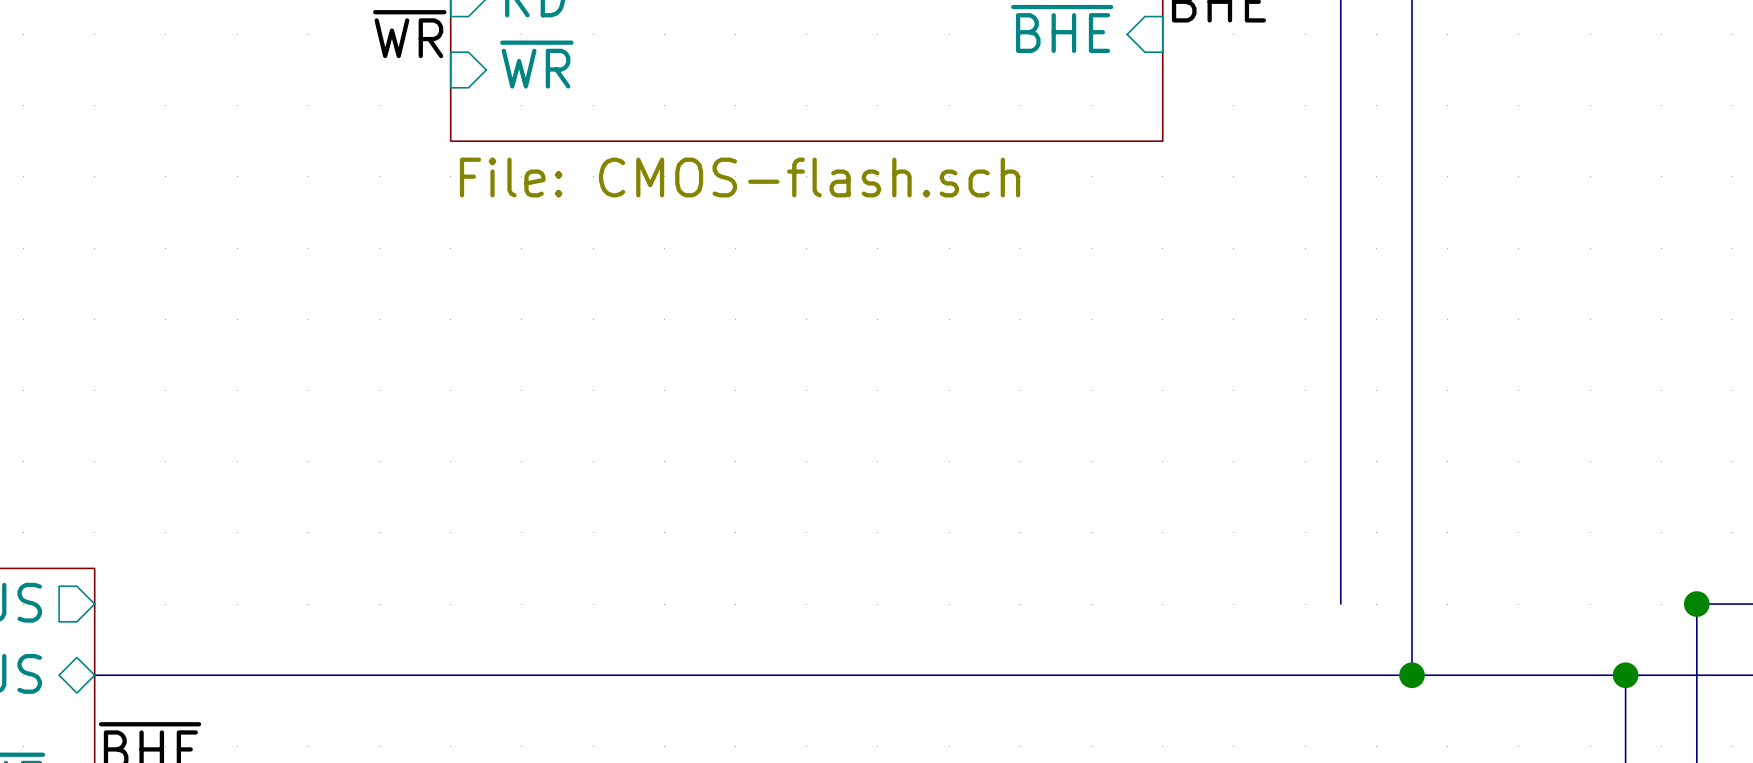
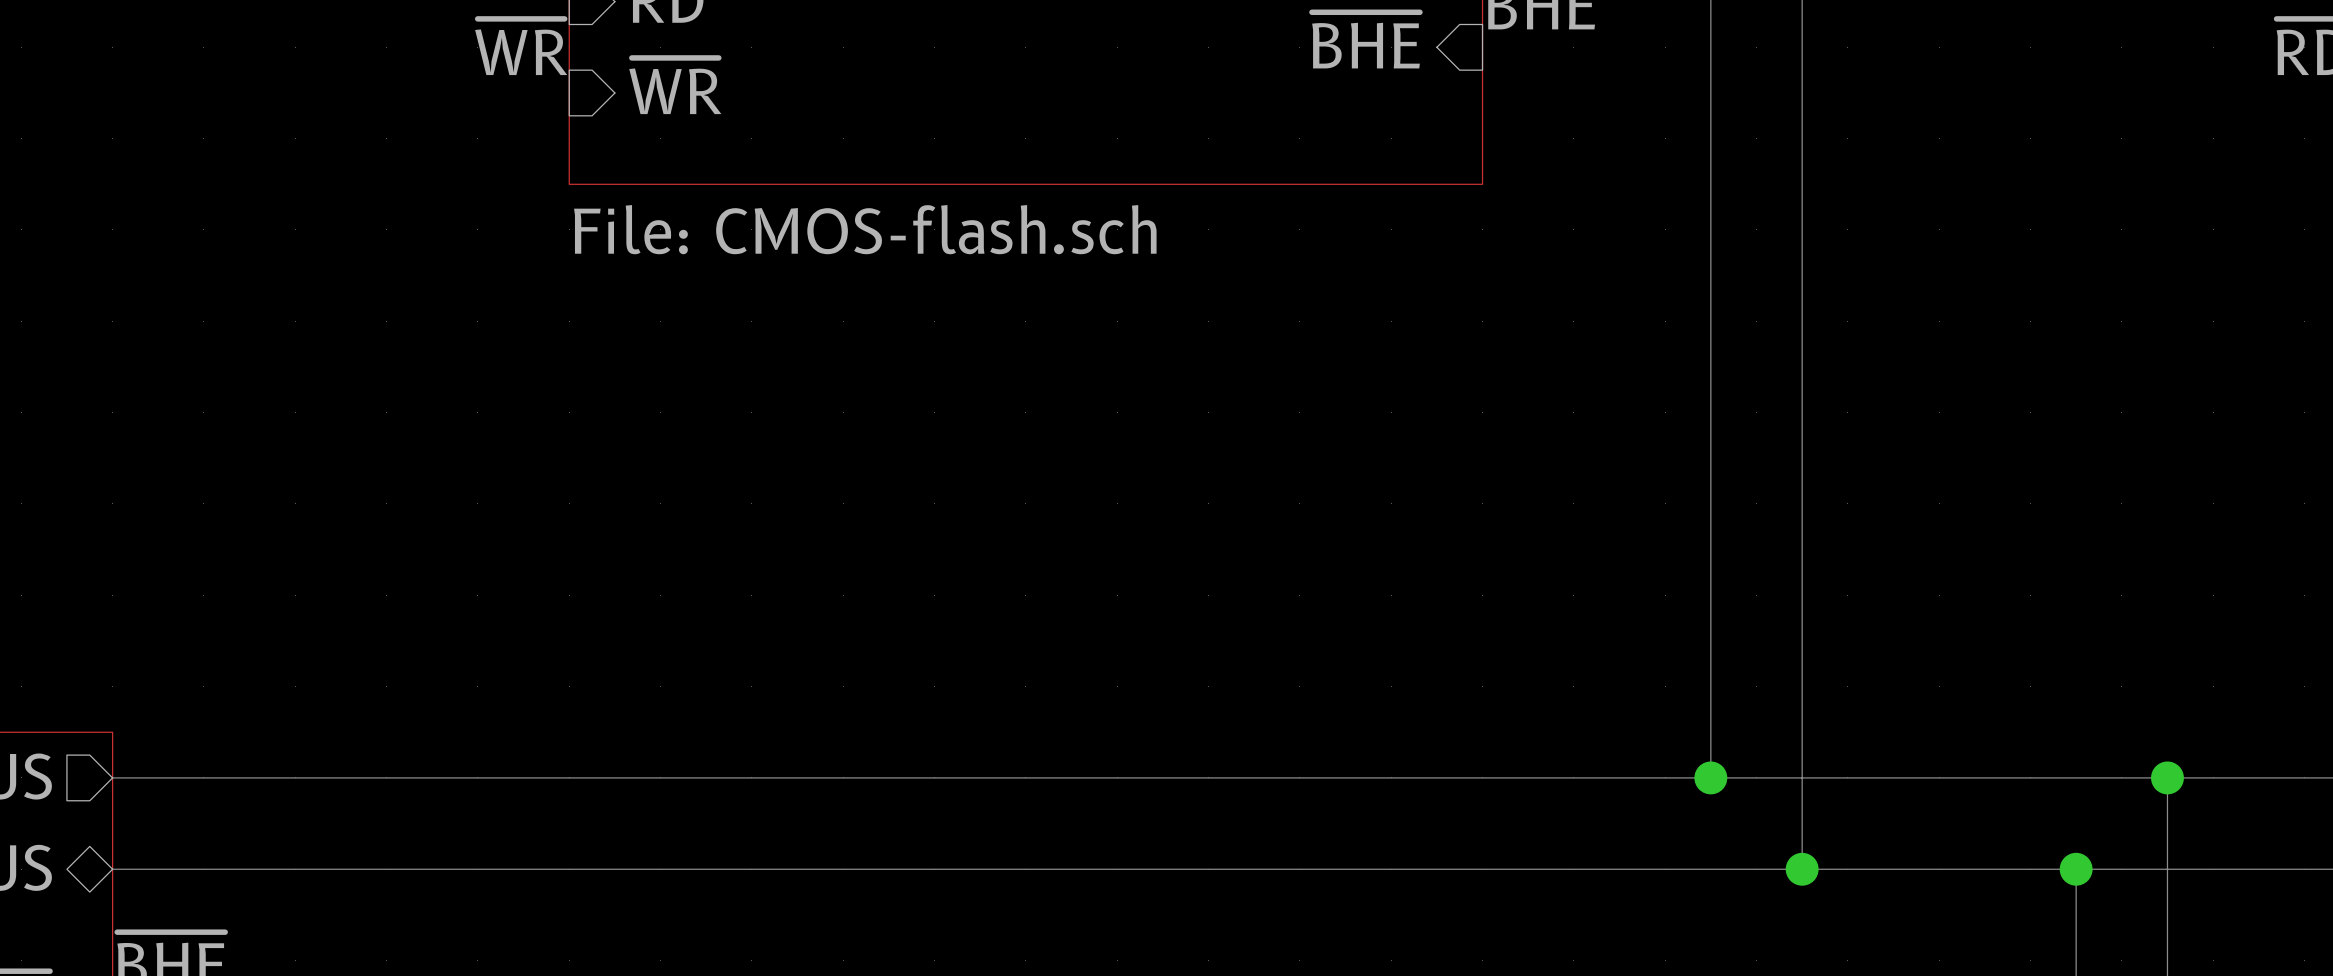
bus: none -> (112, 777) (2167, 777)
junction: none -> (1710, 777)

